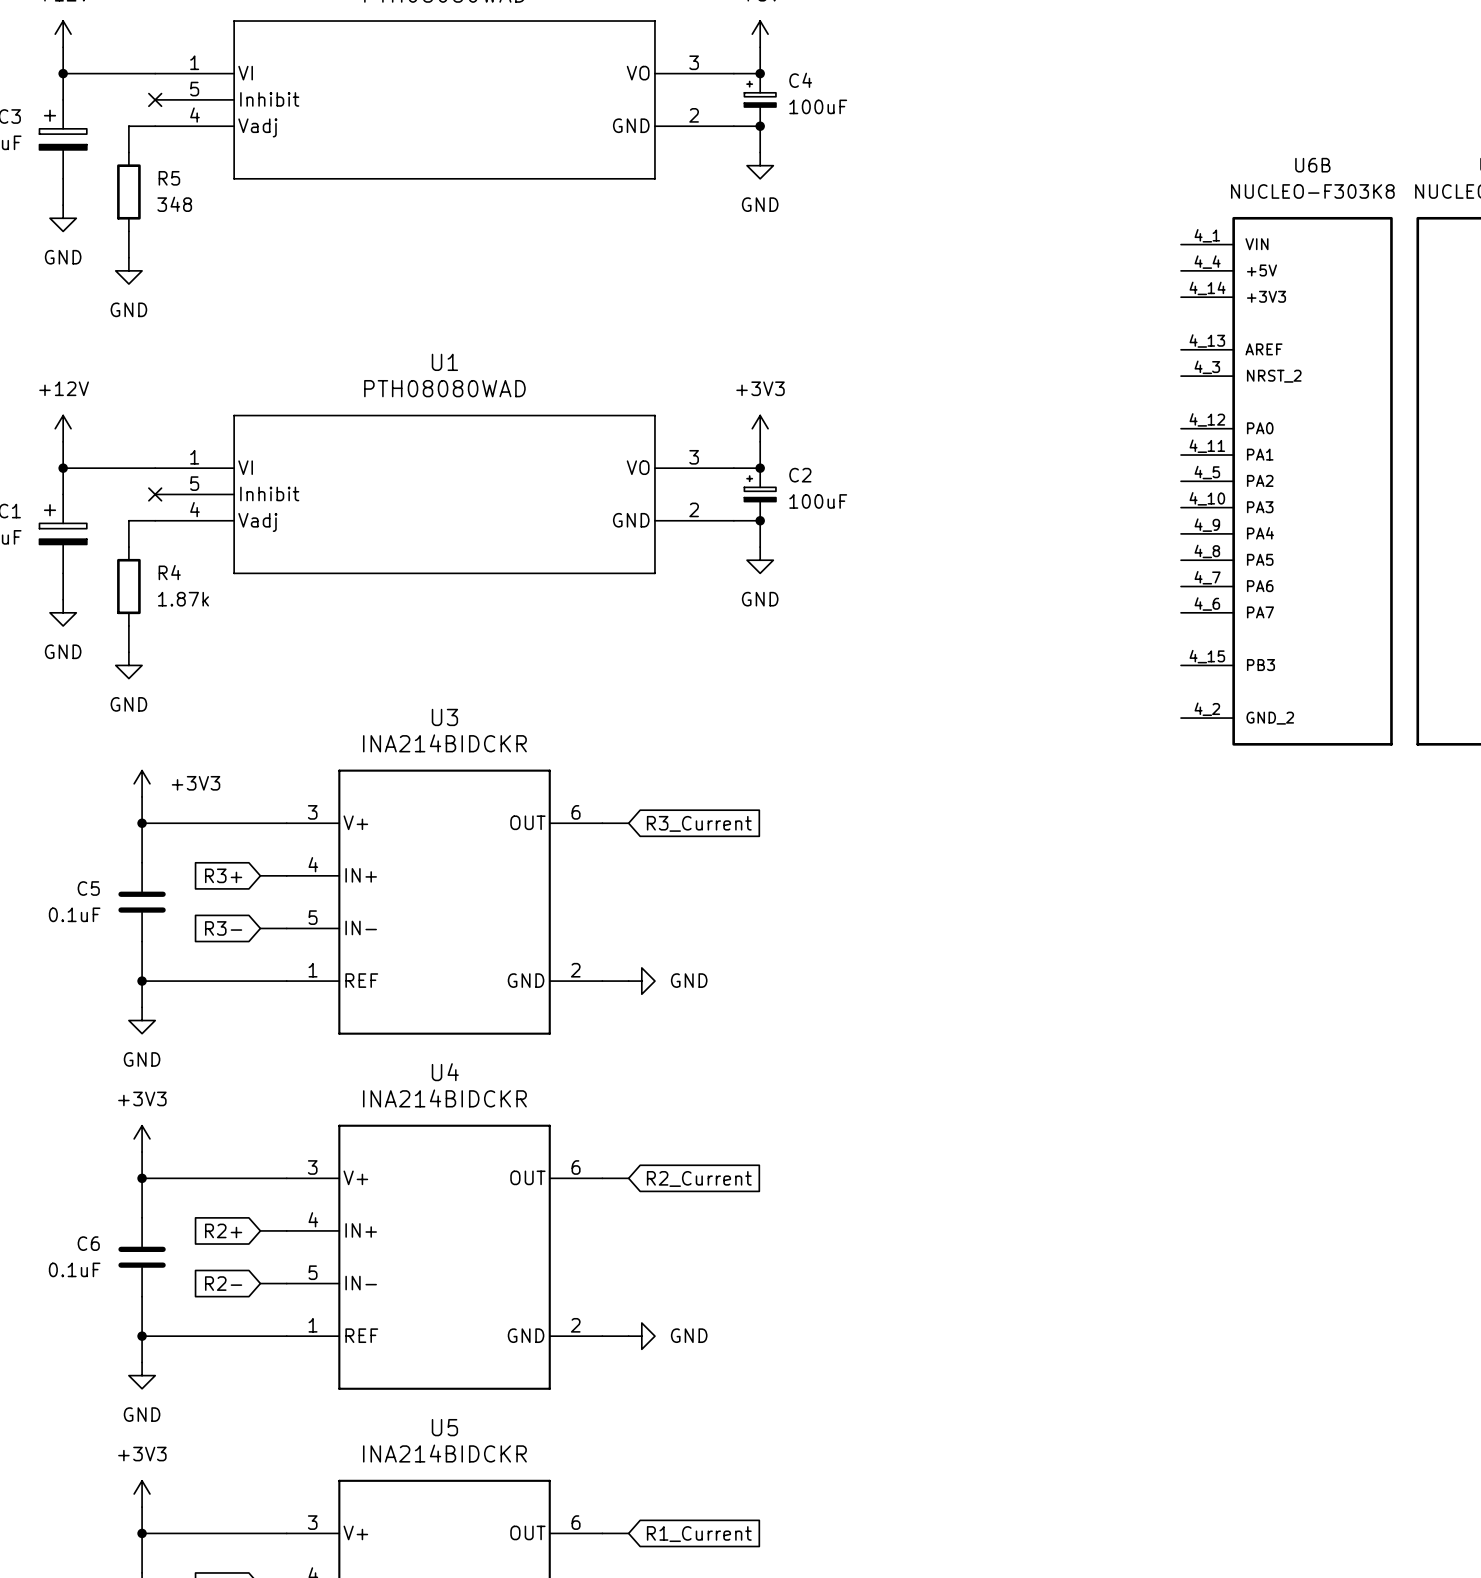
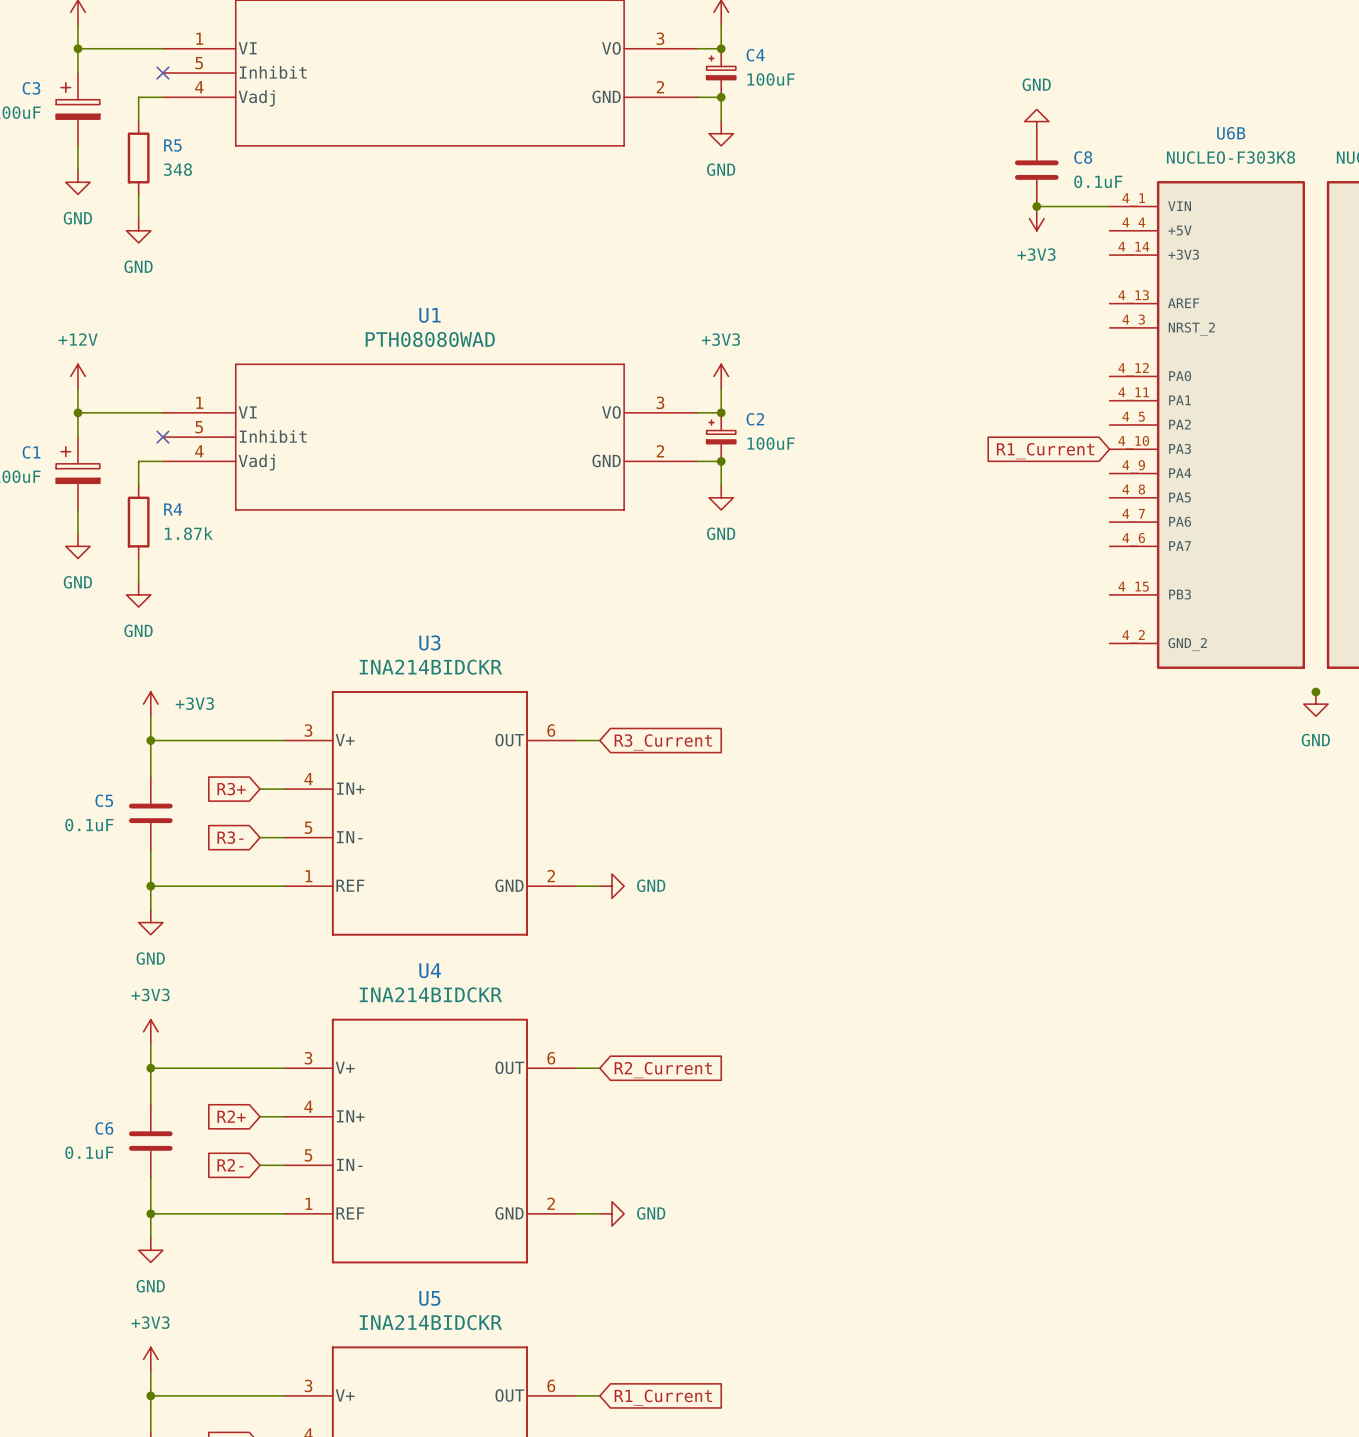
power symbol: none -> GND (1036, 121)
C8: none -> 0.1uF (1036, 170)
wire: none -> (1036, 206) (1109, 206)
junction: none -> (1036, 206)
power symbol: none -> +3V3 (1036, 218)
global label: none -> R1_Current (1045, 451)
junction: none -> (1315, 692)
power symbol: none -> GND (1315, 704)

